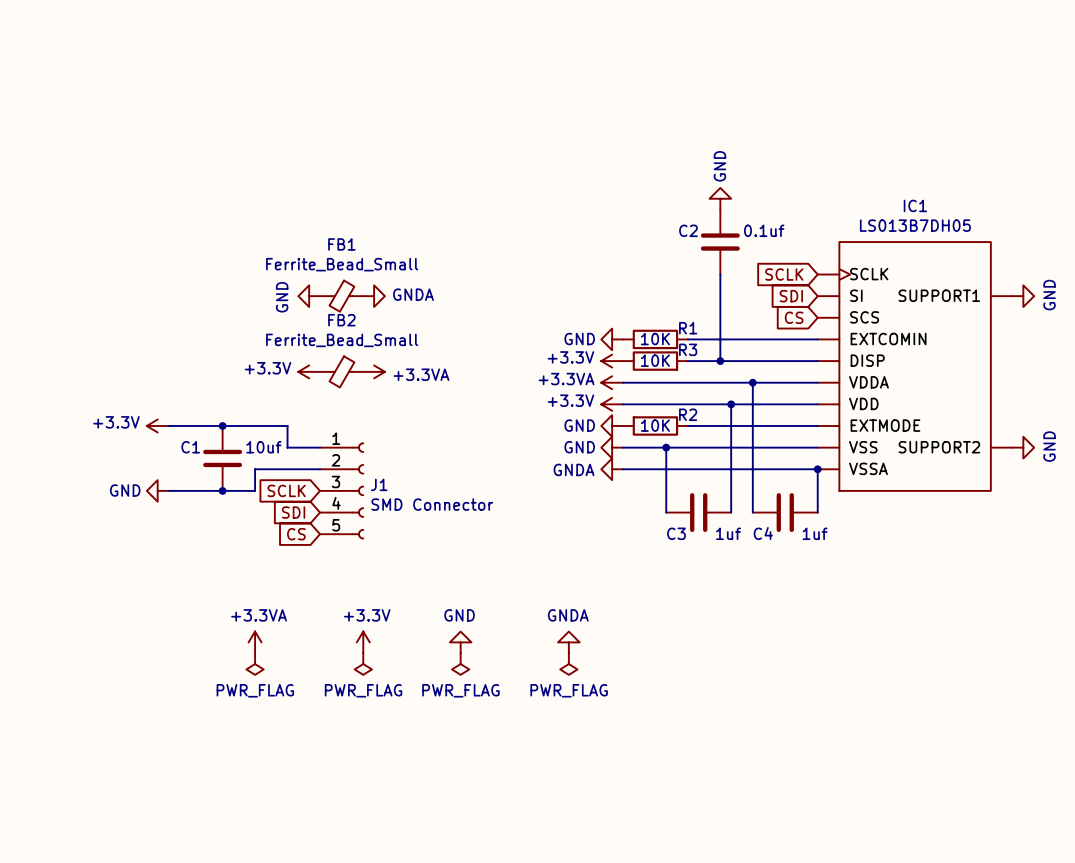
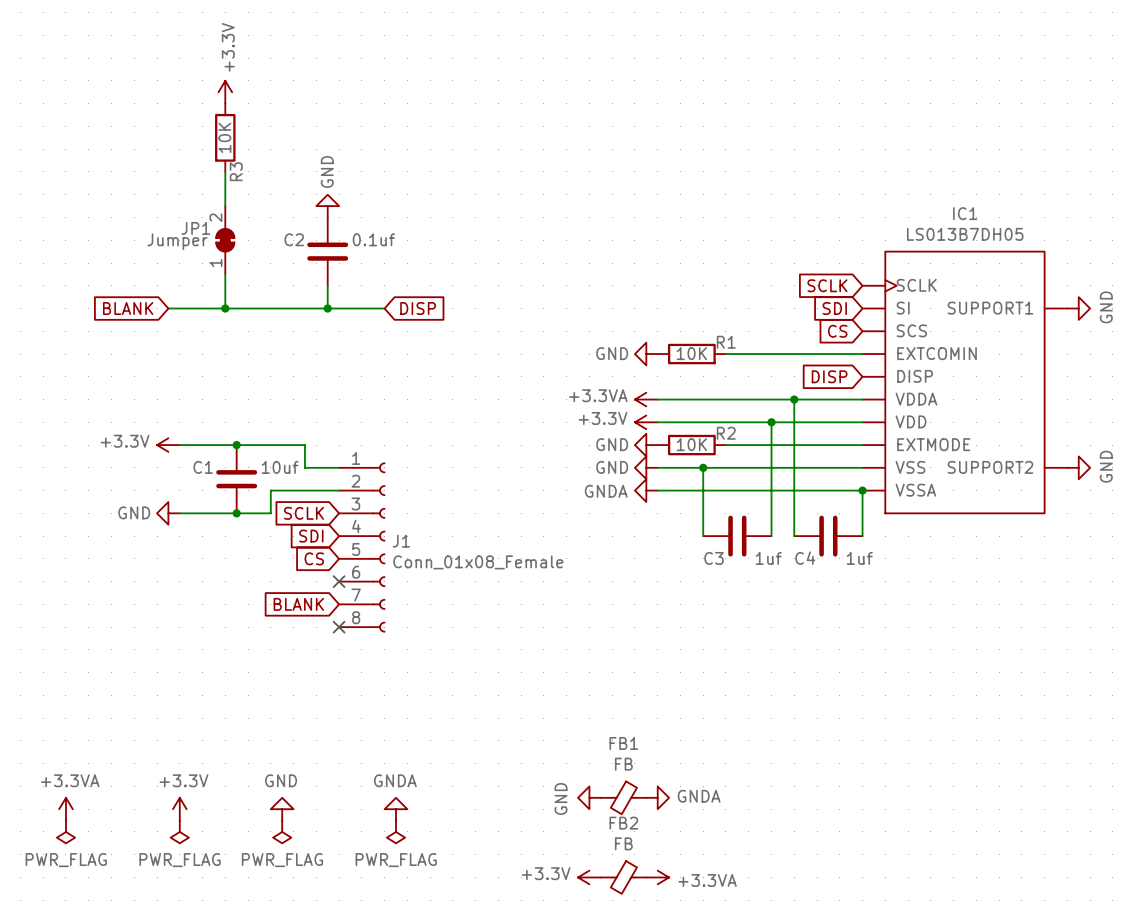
power symbol: none -> +3.3V (225, 92)
wire: none -> (225, 171) (225, 206)
power symbol: GND (720, 198) -> none
JP1: none -> Jumper (225, 240)
C2 position: (720, 242) -> (327, 251)
wire: none -> (225, 274) (225, 308)
FB1 value: Ferrite_Bead_Small (342, 264) -> FB (623, 764)
wire: none -> (327, 285) (327, 308)
wire: (720, 274) (720, 361) -> none
global label: none -> BLANK (128, 308)
wire: none -> (168, 308) (384, 308)
junction: none -> (225, 308)
power symbol rotation: 0° (309, 296) -> 90° clockwise (327, 206)
power symbol position: GND (309, 296) -> GND (327, 206)
junction: none -> (327, 308)
FB1 position: (341, 296) -> (623, 797)
power symbol: GNDA (374, 296) -> none
global label: none -> DISP (418, 308)
FB2 value: Ferrite_Bead_Small (342, 340) -> FB (623, 843)
power symbol: +3.3V (612, 361) -> none
R3 rotation: 0° (655, 361) -> 90° clockwise (225, 137)
R3 position: (655, 361) -> (225, 137)
wire: (687, 361) (817, 361) -> none
junction: (720, 361) -> none
global label: none -> DISP (829, 376)
power symbol: +3.3V (309, 371) -> none
FB2 position: (341, 371) -> (623, 877)
power symbol: +3.3VA (374, 371) -> none
J1 symbol: [319, 442, 364, 540] -> [339, 462, 386, 633]
J1 value: SMD Connector (432, 504) -> Conn_01x08_Female (478, 562)
no-connect mark: none -> (339, 581)
global label: none -> BLANK (298, 604)
no-connect mark: none -> (339, 627)
power symbol: +3.3VA (255, 642) -> none
power symbol: +3.3V (363, 642) -> none
power symbol: GND (460, 642) -> none
power symbol: GNDA (568, 642) -> none
power symbol: PWR_FLAG (255, 664) -> none
power symbol: PWR_FLAG (363, 664) -> none
power symbol: PWR_FLAG (460, 664) -> none
power symbol: PWR_FLAG (568, 664) -> none
power symbol: none -> GND (589, 797)
power symbol: none -> GNDA (657, 797)
power symbol: none -> +3.3VA (65, 809)
power symbol: none -> +3.3V (179, 809)
power symbol: none -> GND (282, 809)
power symbol: none -> GNDA (395, 809)
power symbol: none -> PWR_FLAG (65, 831)
power symbol: none -> PWR_FLAG (179, 831)
power symbol: none -> PWR_FLAG (282, 831)
power symbol: none -> PWR_FLAG (395, 831)
power symbol: none -> +3.3V (589, 877)
power symbol: none -> +3.3VA (657, 877)

